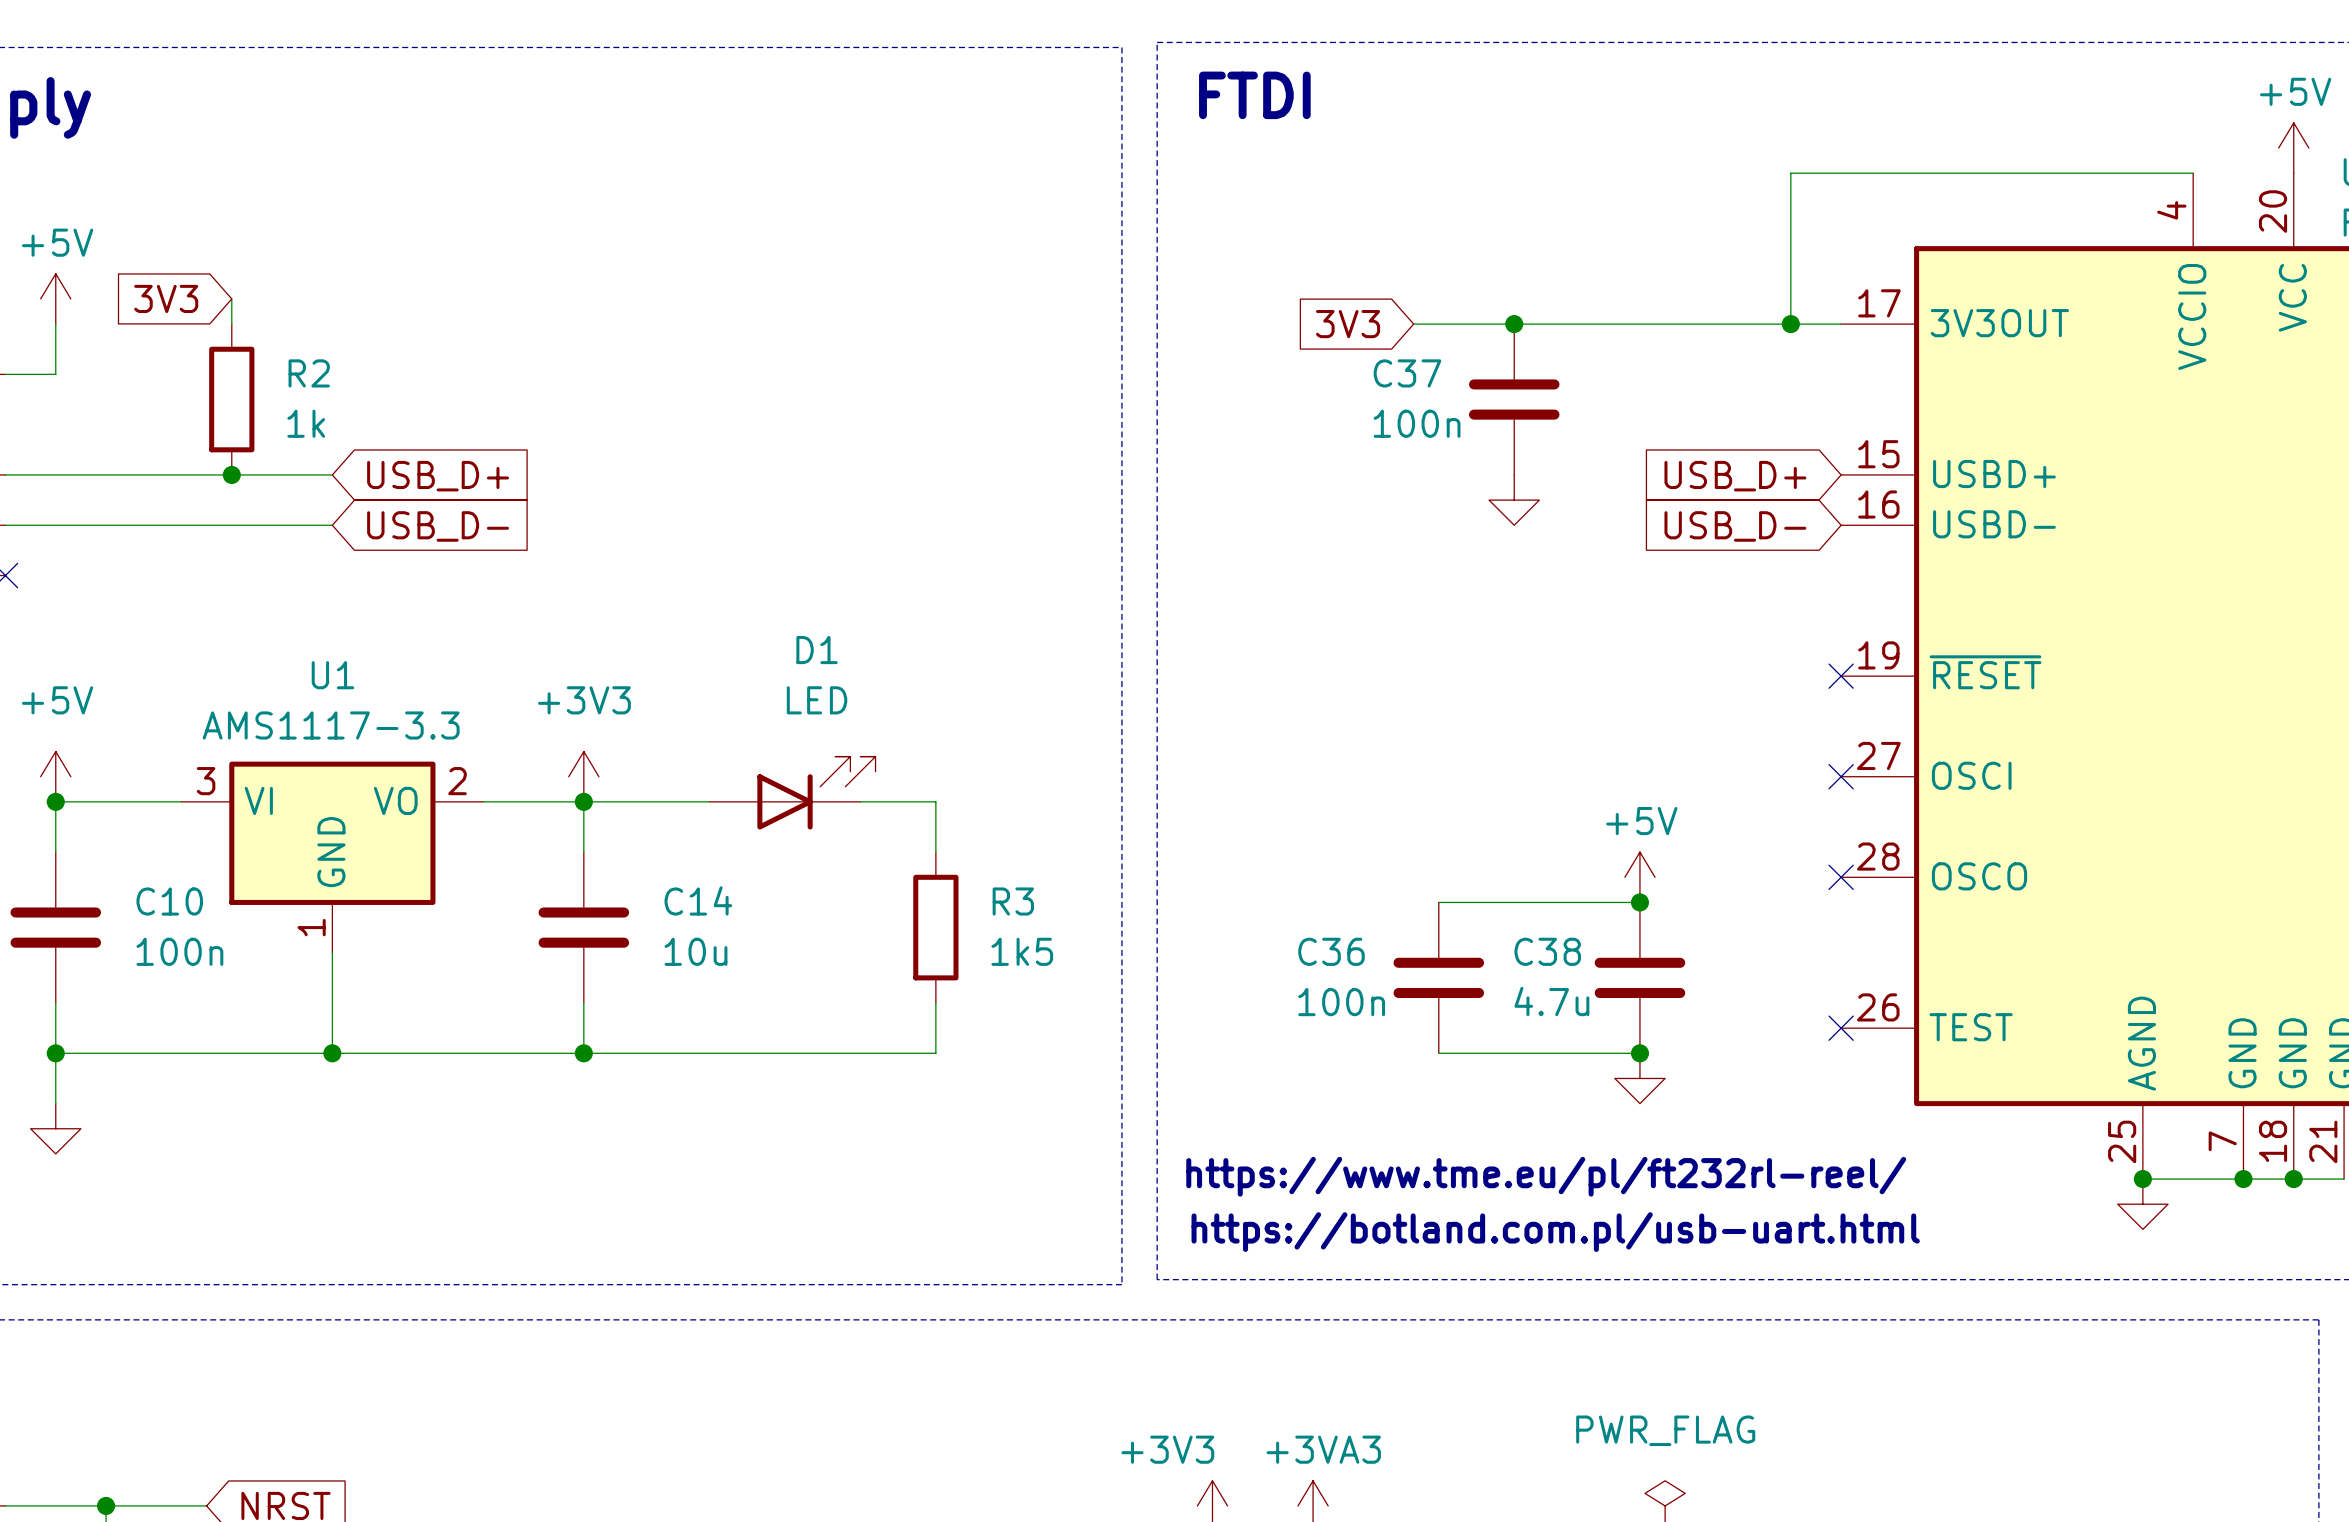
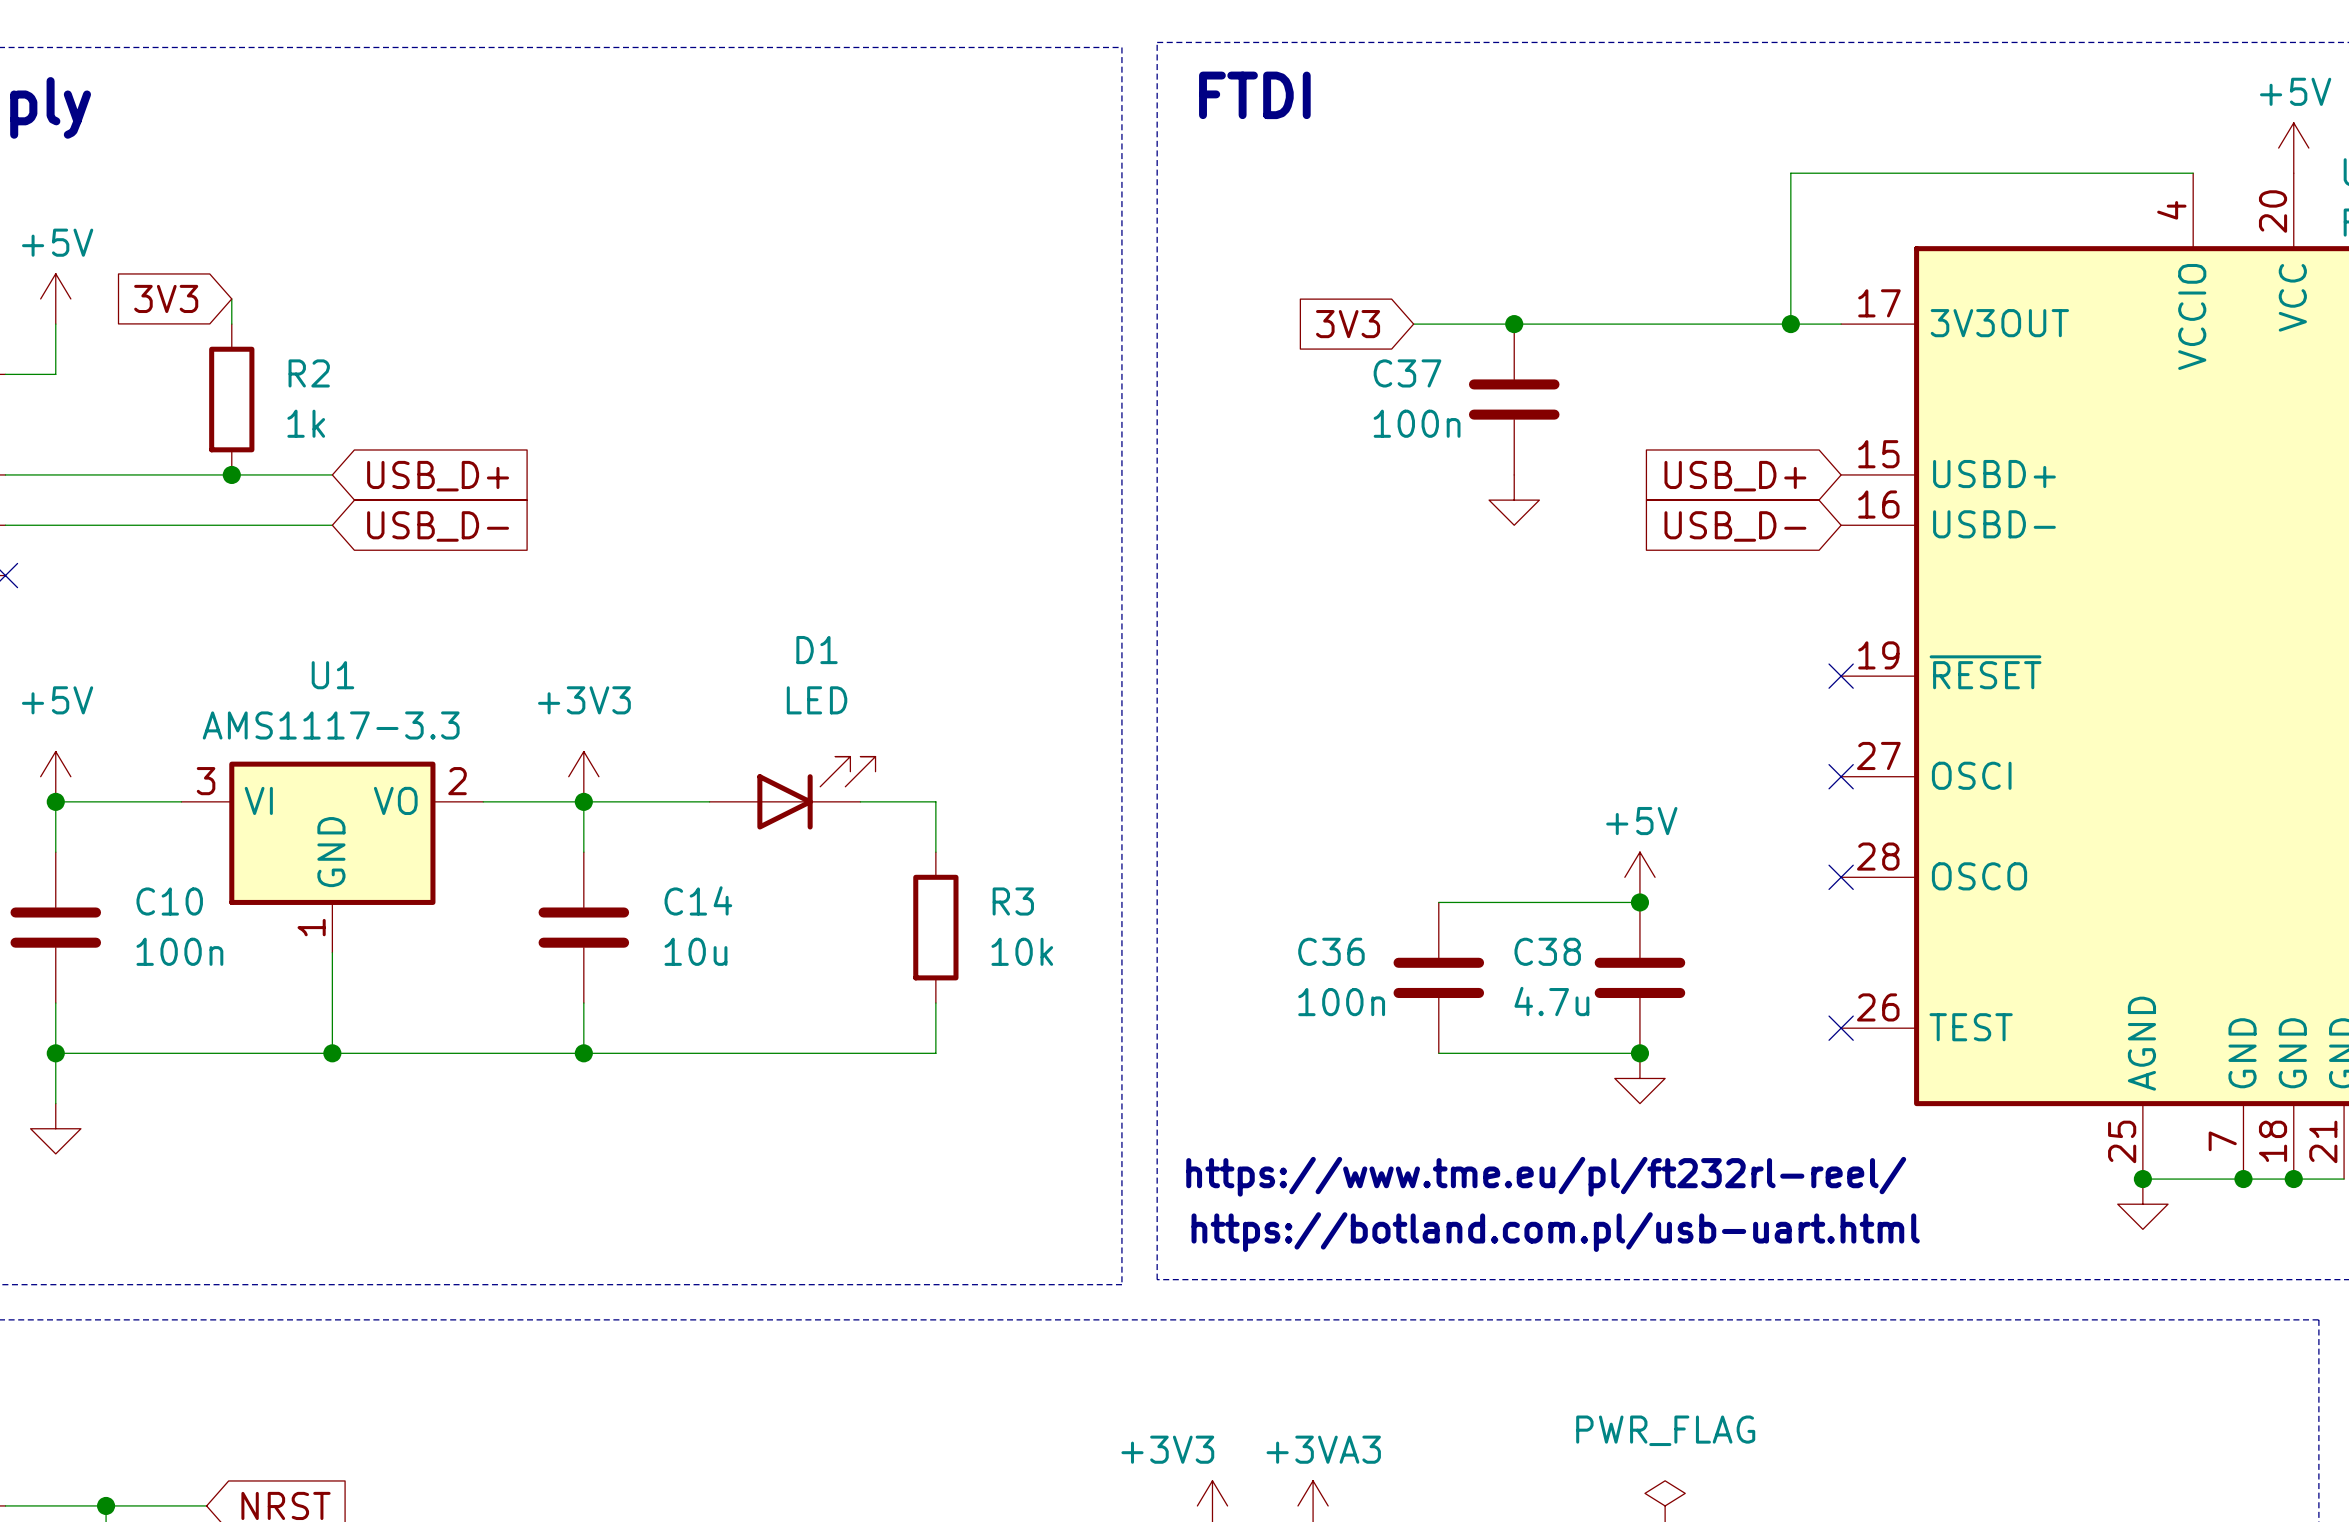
R3 value: 1k5 (1022, 951) -> 10k (1022, 951)

